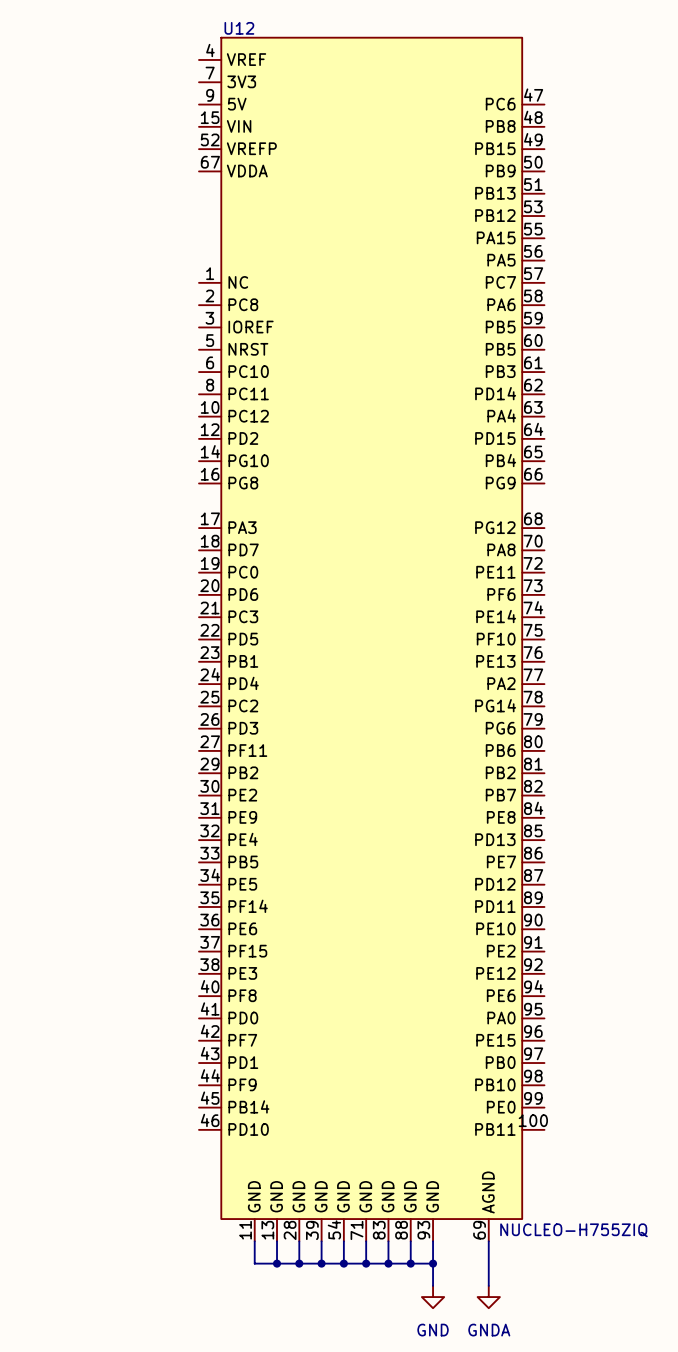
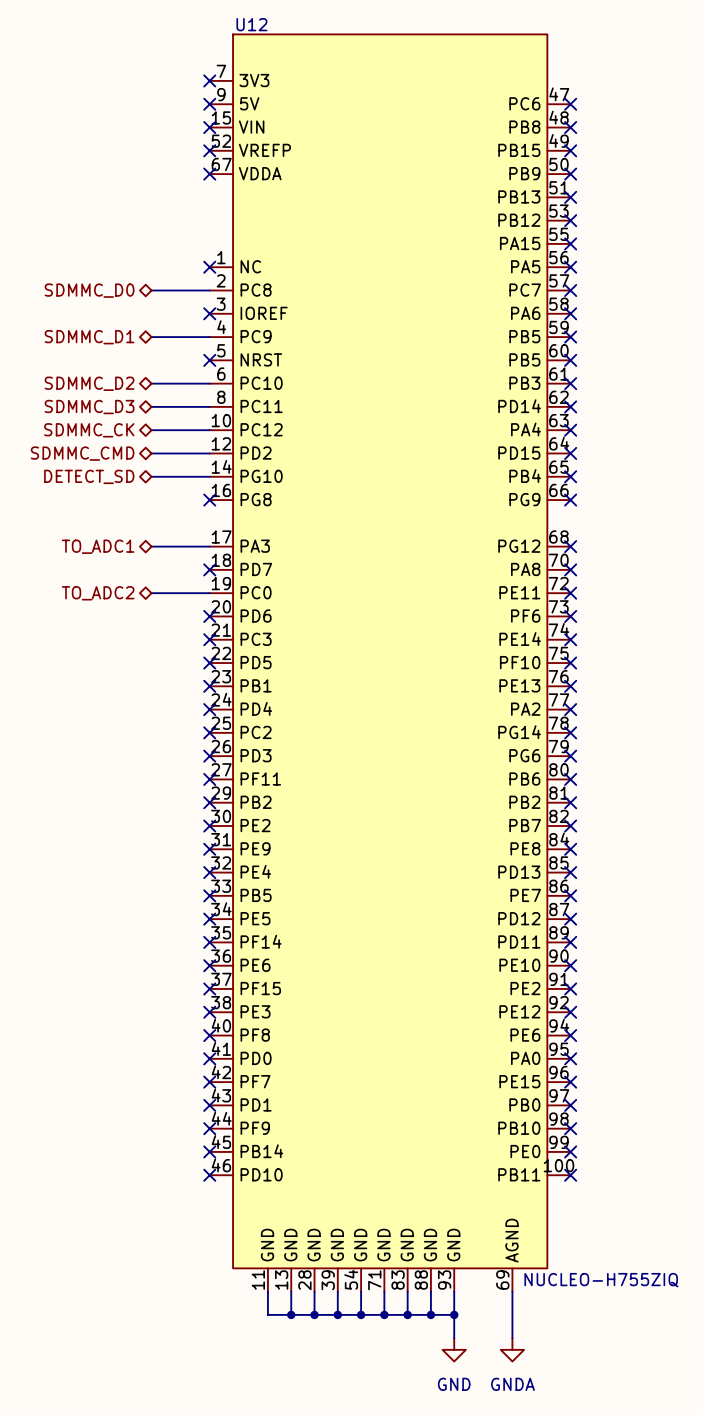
U12 symbol: [198, 37, 545, 1242] -> [209, 34, 571, 1292]
no-connect mark: none -> (209, 80)
no-connect mark: none -> (209, 104)
no-connect mark: none -> (570, 104)
no-connect mark: none -> (209, 127)
no-connect mark: none -> (570, 127)
no-connect mark: none -> (209, 150)
no-connect mark: none -> (570, 150)
no-connect mark: none -> (209, 174)
no-connect mark: none -> (570, 174)
no-connect mark: none -> (570, 197)
no-connect mark: none -> (570, 220)
no-connect mark: none -> (570, 243)
no-connect mark: none -> (209, 267)
no-connect mark: none -> (570, 267)
hierarchical label: none -> SDMMC_D0 (89, 290)
wire: none -> (151, 290) (209, 290)
no-connect mark: none -> (570, 290)
no-connect mark: none -> (209, 313)
no-connect mark: none -> (570, 313)
hierarchical label: none -> SDMMC_D1 (89, 337)
wire: none -> (151, 337) (209, 337)
no-connect mark: none -> (570, 337)
no-connect mark: none -> (209, 360)
no-connect mark: none -> (570, 360)
hierarchical label: none -> SDMMC_D2 (89, 383)
wire: none -> (151, 383) (209, 383)
no-connect mark: none -> (570, 383)
hierarchical label: none -> SDMMC_D3 (89, 407)
wire: none -> (151, 406) (209, 406)
no-connect mark: none -> (570, 406)
hierarchical label: none -> SDMMC_CK (89, 430)
wire: none -> (151, 430) (209, 430)
no-connect mark: none -> (570, 430)
wire: none -> (151, 453) (209, 453)
no-connect mark: none -> (570, 453)
hierarchical label: none -> SDMMC_CMD (82, 453)
hierarchical label: none -> DETECT_SD (89, 476)
wire: none -> (151, 476) (209, 476)
no-connect mark: none -> (570, 476)
no-connect mark: none -> (209, 500)
no-connect mark: none -> (570, 500)
hierarchical label: none -> TO_ADC1 (98, 546)
wire: none -> (151, 546) (209, 546)
no-connect mark: none -> (570, 546)
no-connect mark: none -> (209, 569)
no-connect mark: none -> (570, 569)
hierarchical label: none -> TO_ADC2 (98, 593)
wire: none -> (151, 593) (209, 593)
no-connect mark: none -> (570, 593)
no-connect mark: none -> (209, 616)
no-connect mark: none -> (570, 616)
no-connect mark: none -> (209, 639)
no-connect mark: none -> (570, 639)
no-connect mark: none -> (209, 663)
no-connect mark: none -> (570, 663)
no-connect mark: none -> (209, 686)
no-connect mark: none -> (570, 686)
no-connect mark: none -> (209, 709)
no-connect mark: none -> (570, 709)
no-connect mark: none -> (209, 732)
no-connect mark: none -> (570, 732)
no-connect mark: none -> (209, 756)
no-connect mark: none -> (570, 756)
no-connect mark: none -> (209, 779)
no-connect mark: none -> (570, 779)
no-connect mark: none -> (209, 802)
no-connect mark: none -> (570, 802)
no-connect mark: none -> (209, 826)
no-connect mark: none -> (570, 826)
no-connect mark: none -> (209, 849)
no-connect mark: none -> (570, 849)
no-connect mark: none -> (209, 872)
no-connect mark: none -> (570, 872)
no-connect mark: none -> (209, 895)
no-connect mark: none -> (570, 895)
no-connect mark: none -> (209, 919)
no-connect mark: none -> (570, 919)
no-connect mark: none -> (209, 942)
no-connect mark: none -> (570, 942)
no-connect mark: none -> (209, 965)
no-connect mark: none -> (570, 965)
no-connect mark: none -> (209, 988)
no-connect mark: none -> (570, 988)
no-connect mark: none -> (209, 1012)
no-connect mark: none -> (570, 1012)
no-connect mark: none -> (209, 1035)
no-connect mark: none -> (570, 1035)
no-connect mark: none -> (209, 1058)
no-connect mark: none -> (570, 1058)
no-connect mark: none -> (209, 1082)
no-connect mark: none -> (570, 1082)
no-connect mark: none -> (209, 1105)
no-connect mark: none -> (570, 1105)
no-connect mark: none -> (209, 1128)
no-connect mark: none -> (570, 1128)
no-connect mark: none -> (209, 1151)
no-connect mark: none -> (570, 1151)
no-connect mark: none -> (209, 1175)
no-connect mark: none -> (570, 1175)

